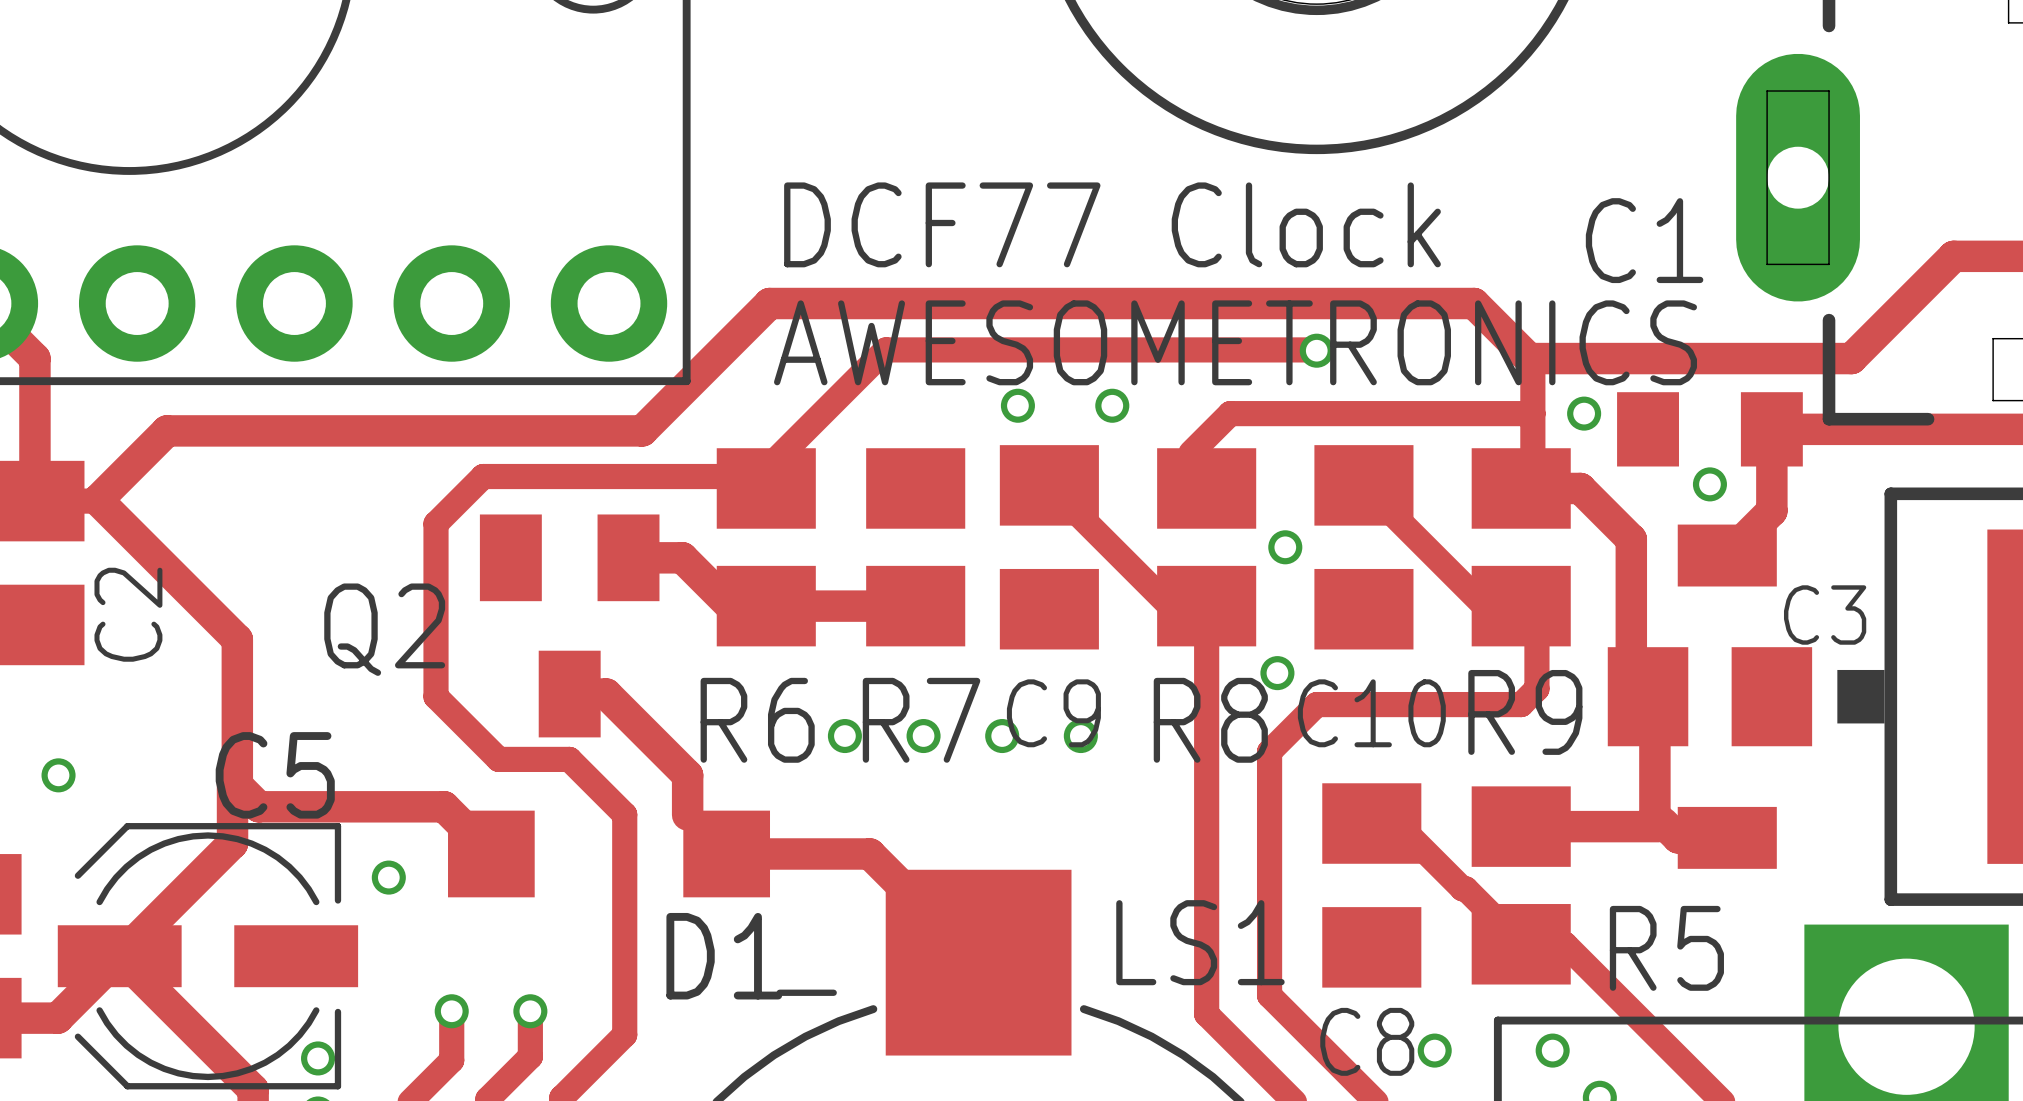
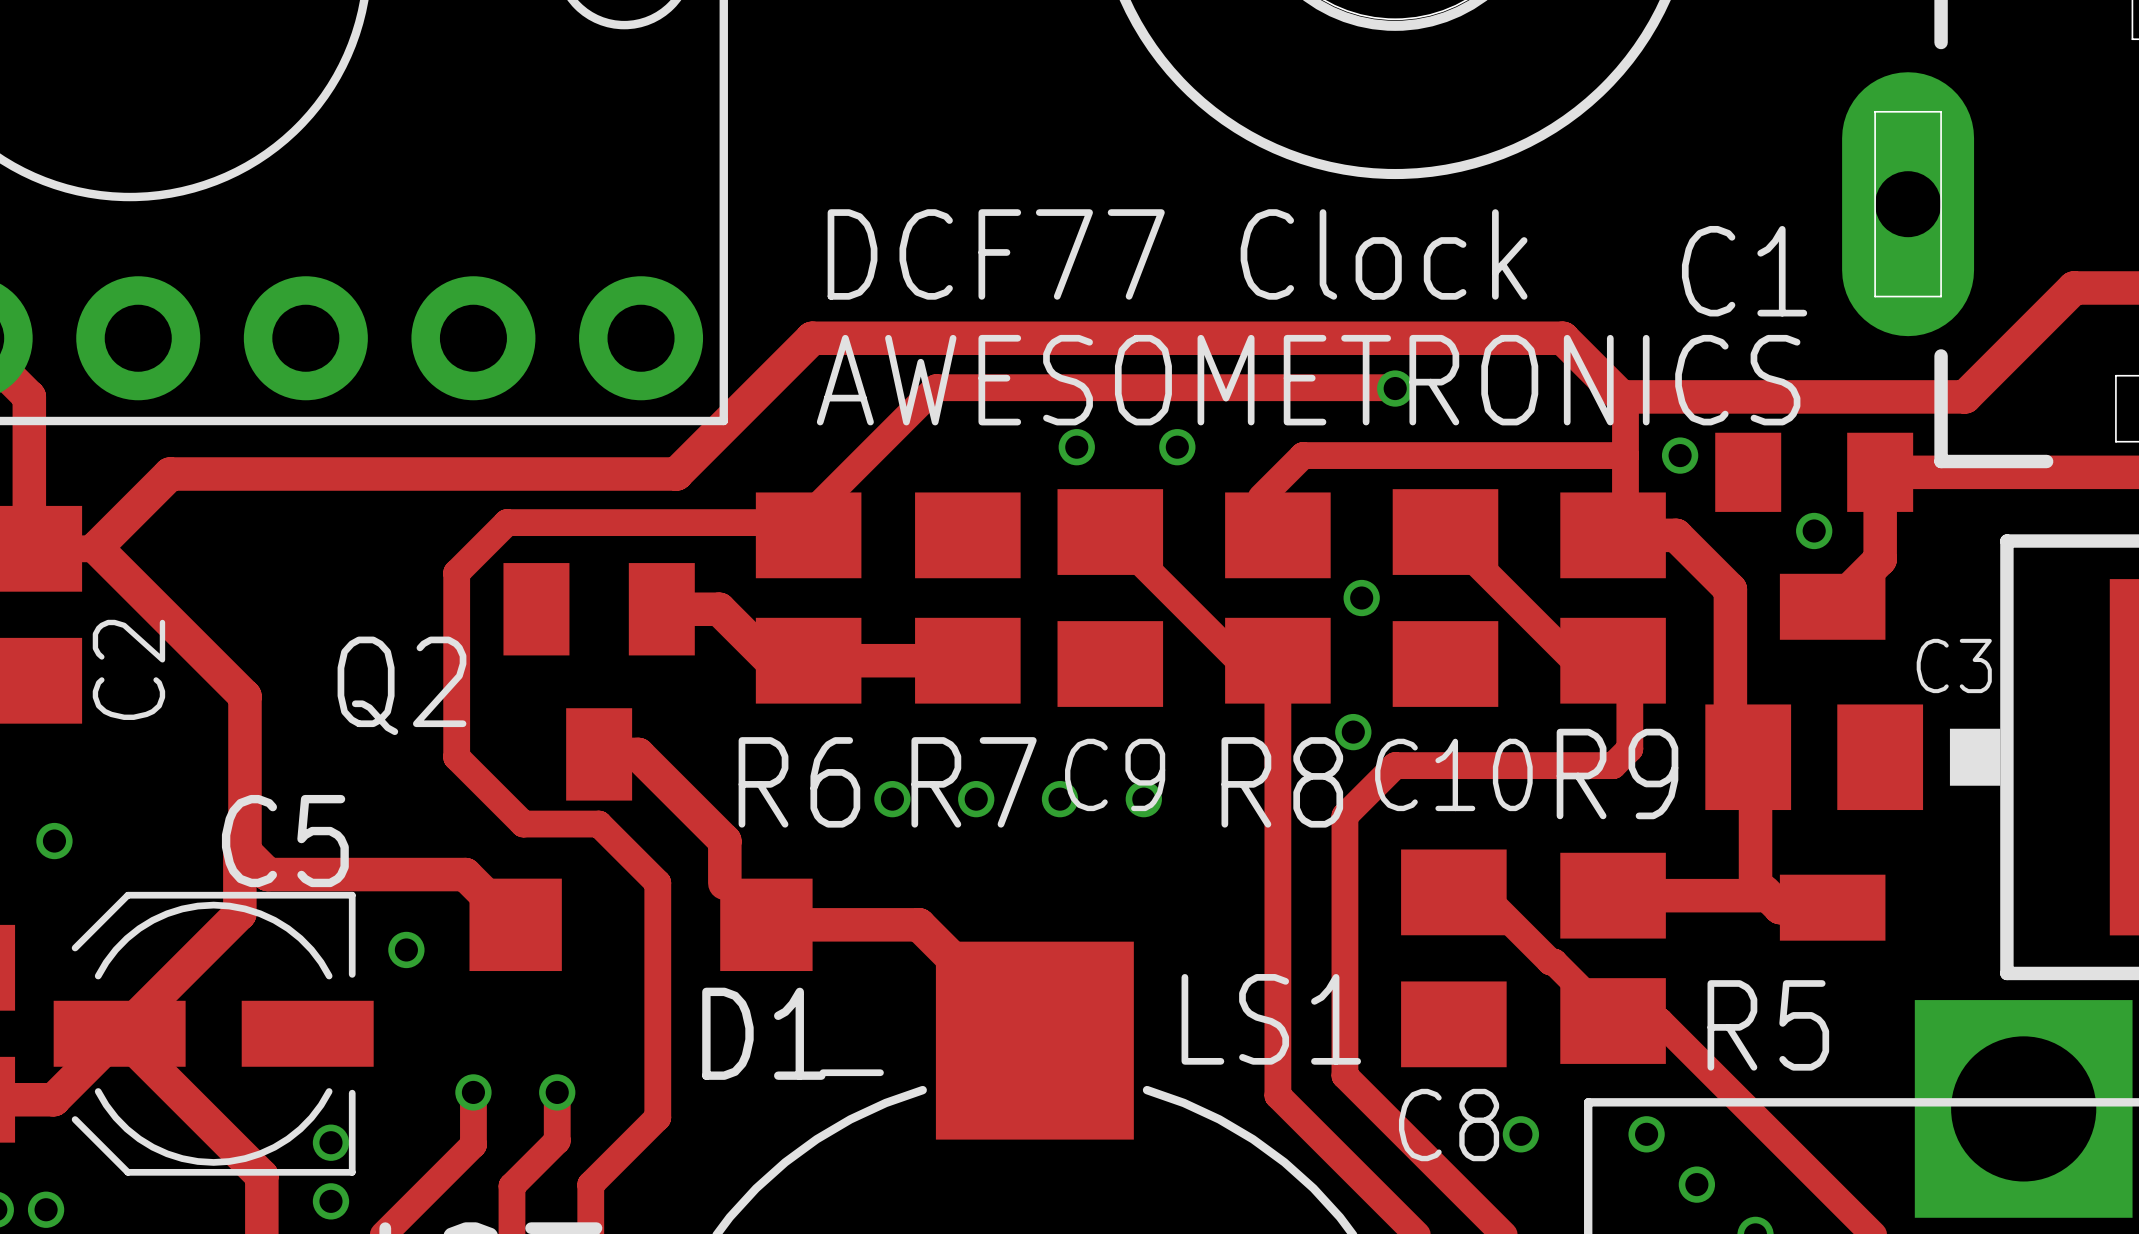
C3 name position: C3 (1825, 615) -> C3 (1954, 665)

